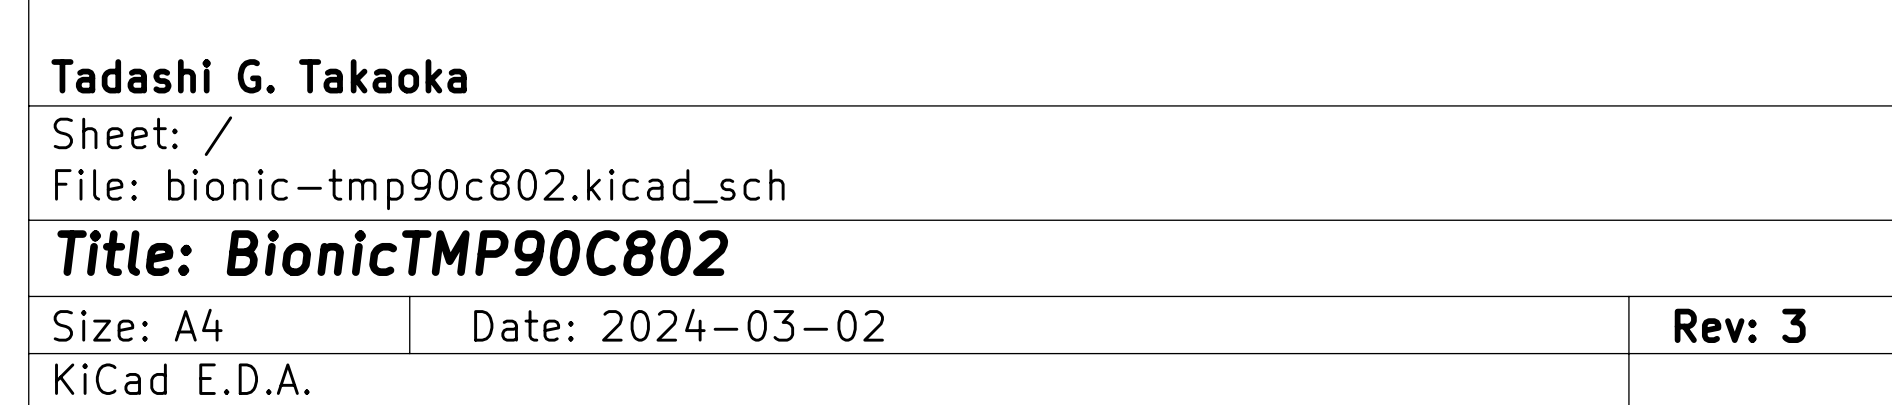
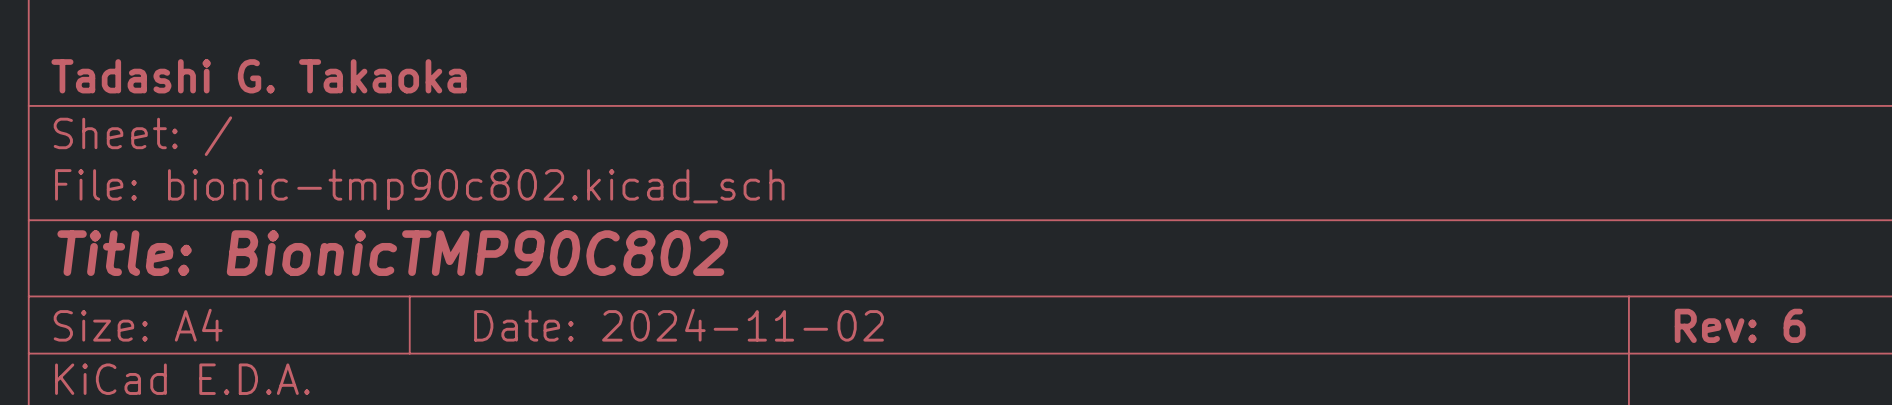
title block: Date: 2024-03-02 (679, 325) -> Date: 2024-11-02 (679, 325)
title block: Rev: 3 (1740, 325) -> Rev: 6 (1740, 325)

